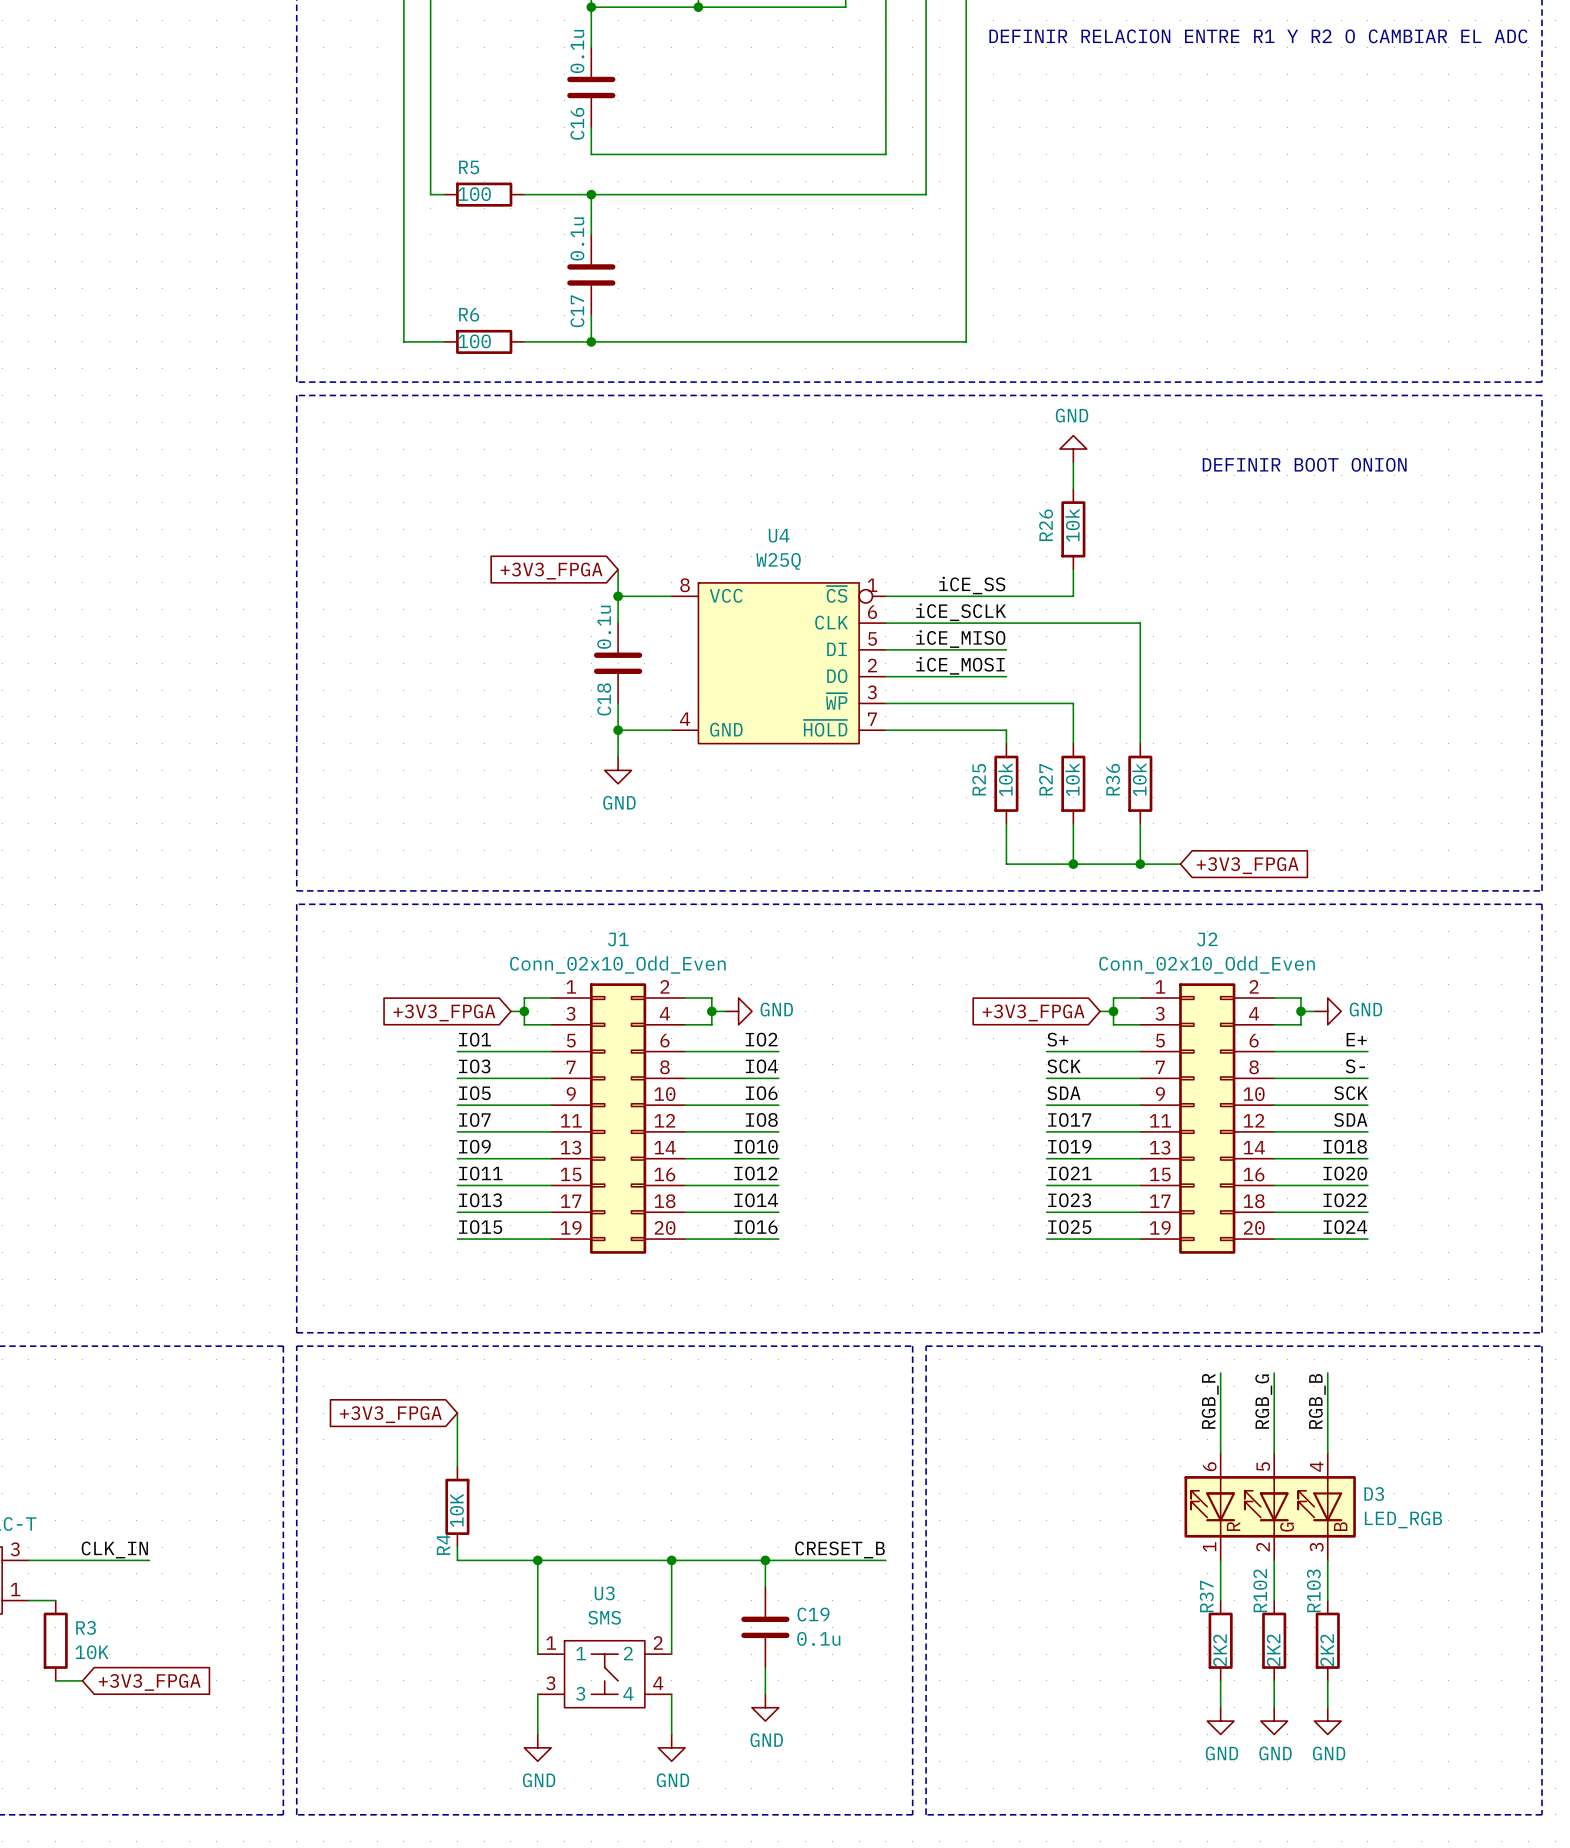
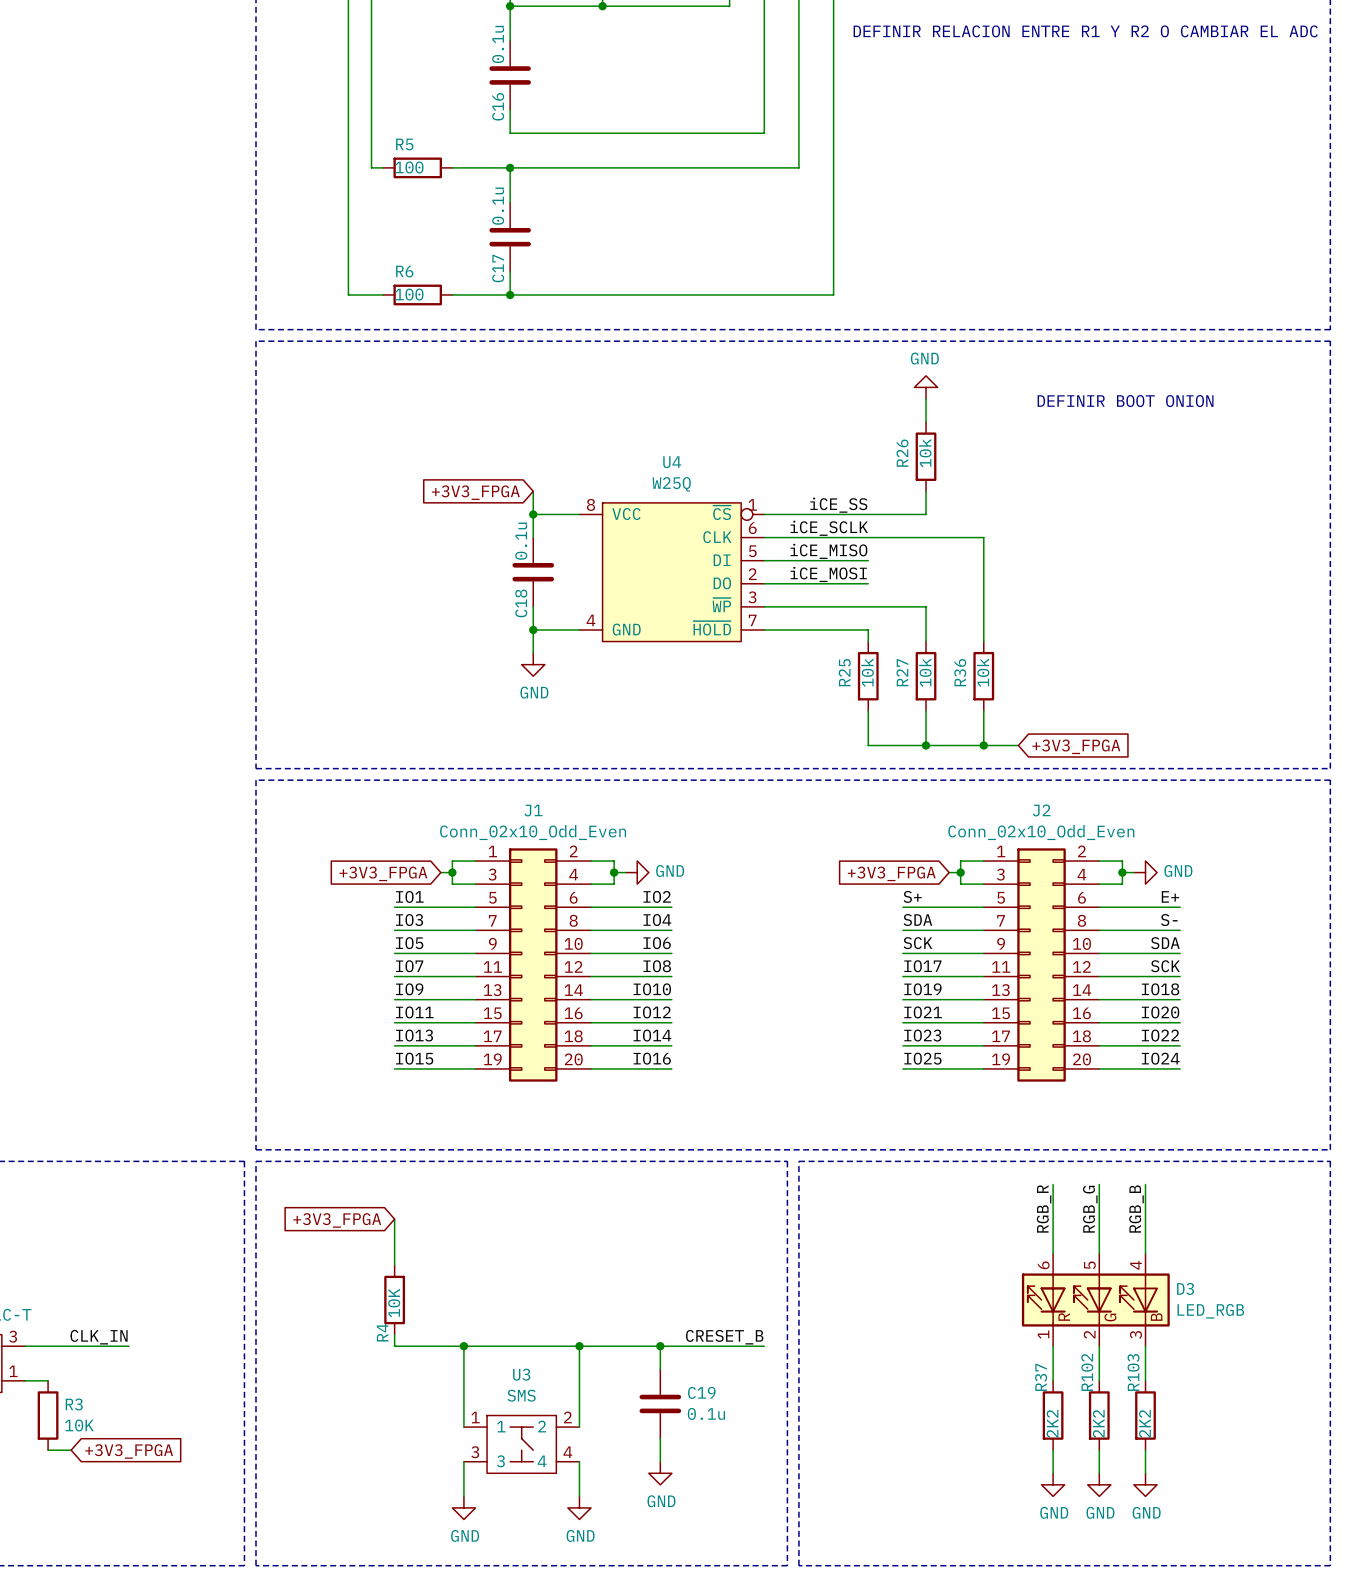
label: SCK (1064, 1066) -> SDA (917, 920)
label: SDA (1063, 1093) -> SCK (918, 943)
label: SCK (1350, 1093) -> SDA (1165, 943)
label: SDA (1350, 1119) -> SCK (1165, 966)

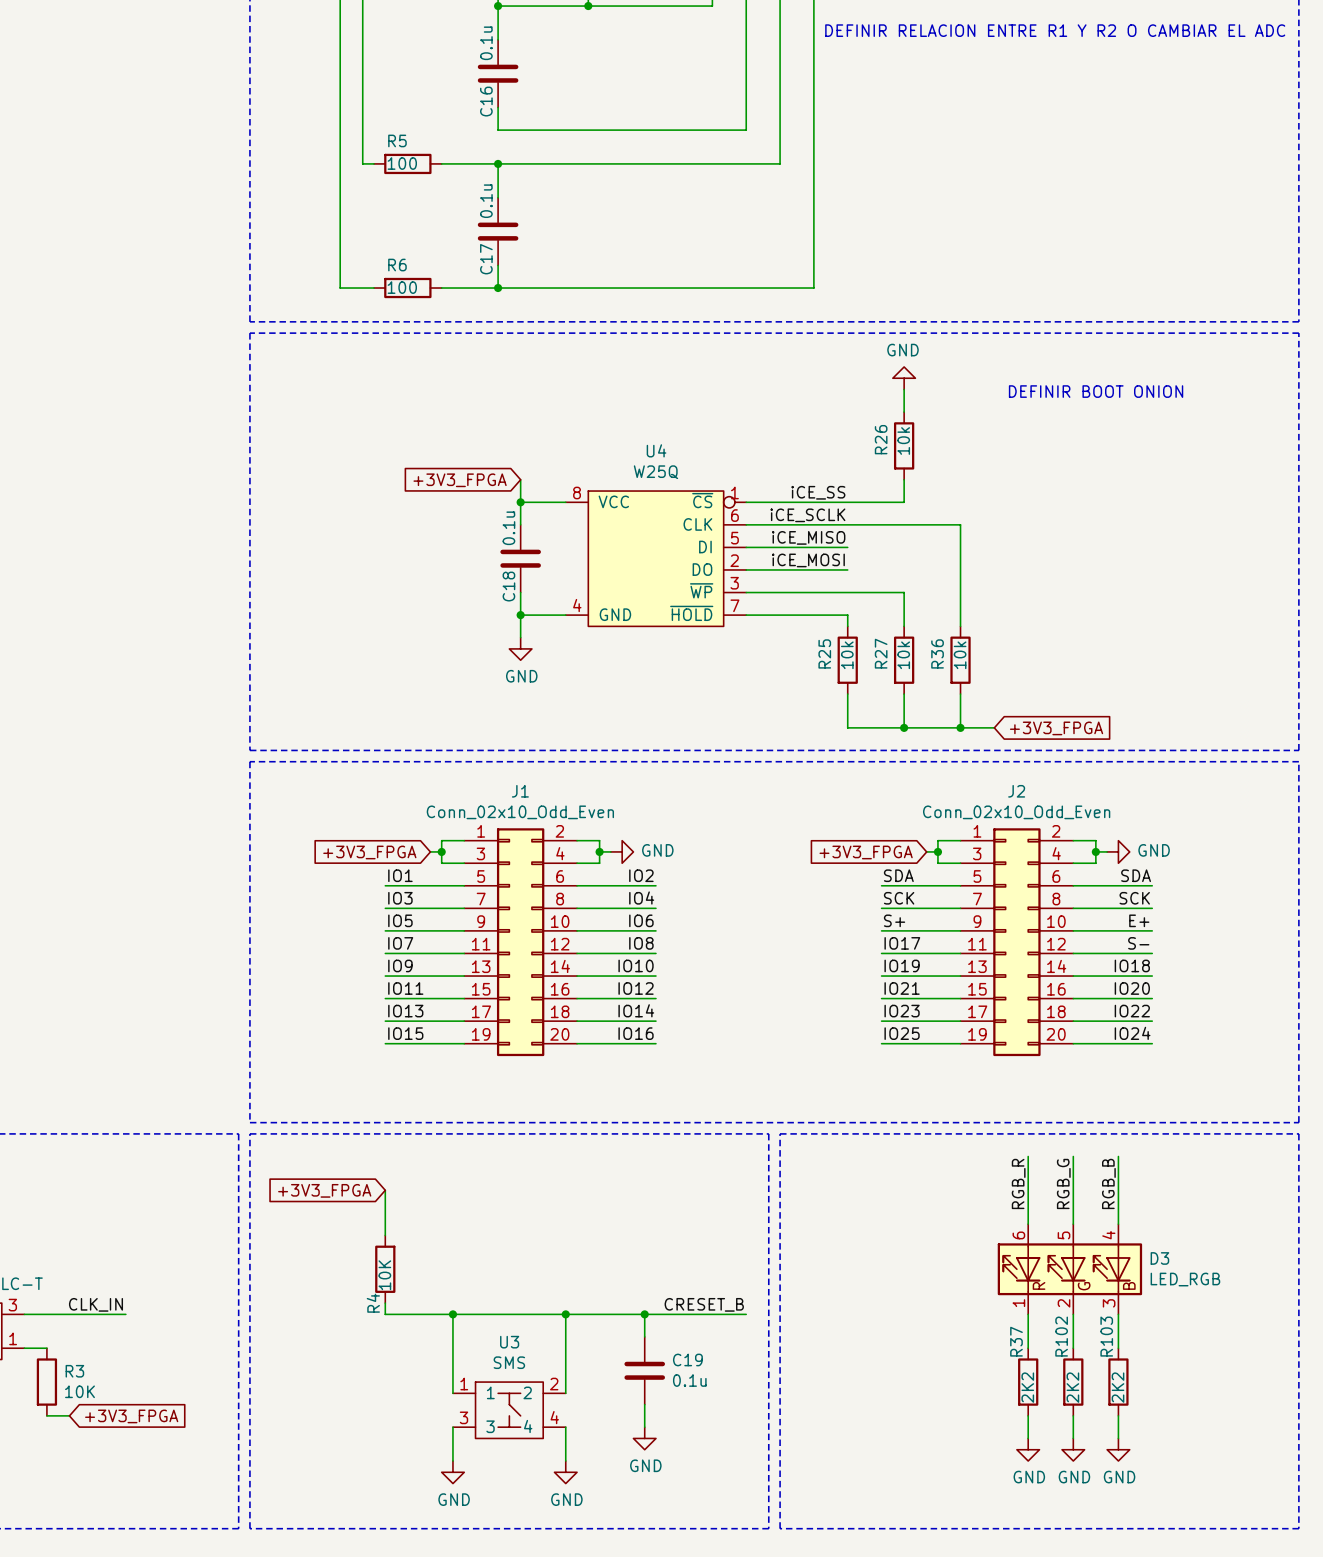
label: S+ (912, 896) -> SDA (898, 875)
label: E+ (1170, 896) -> SDA (1136, 875)
label: SDA (917, 920) -> SCK (899, 898)
label: S- (1169, 920) -> SCK (1134, 898)
label: SCK (918, 943) -> S+ (894, 920)
label: SDA (1165, 943) -> E+ (1139, 920)
label: SCK (1165, 966) -> S- (1138, 943)

